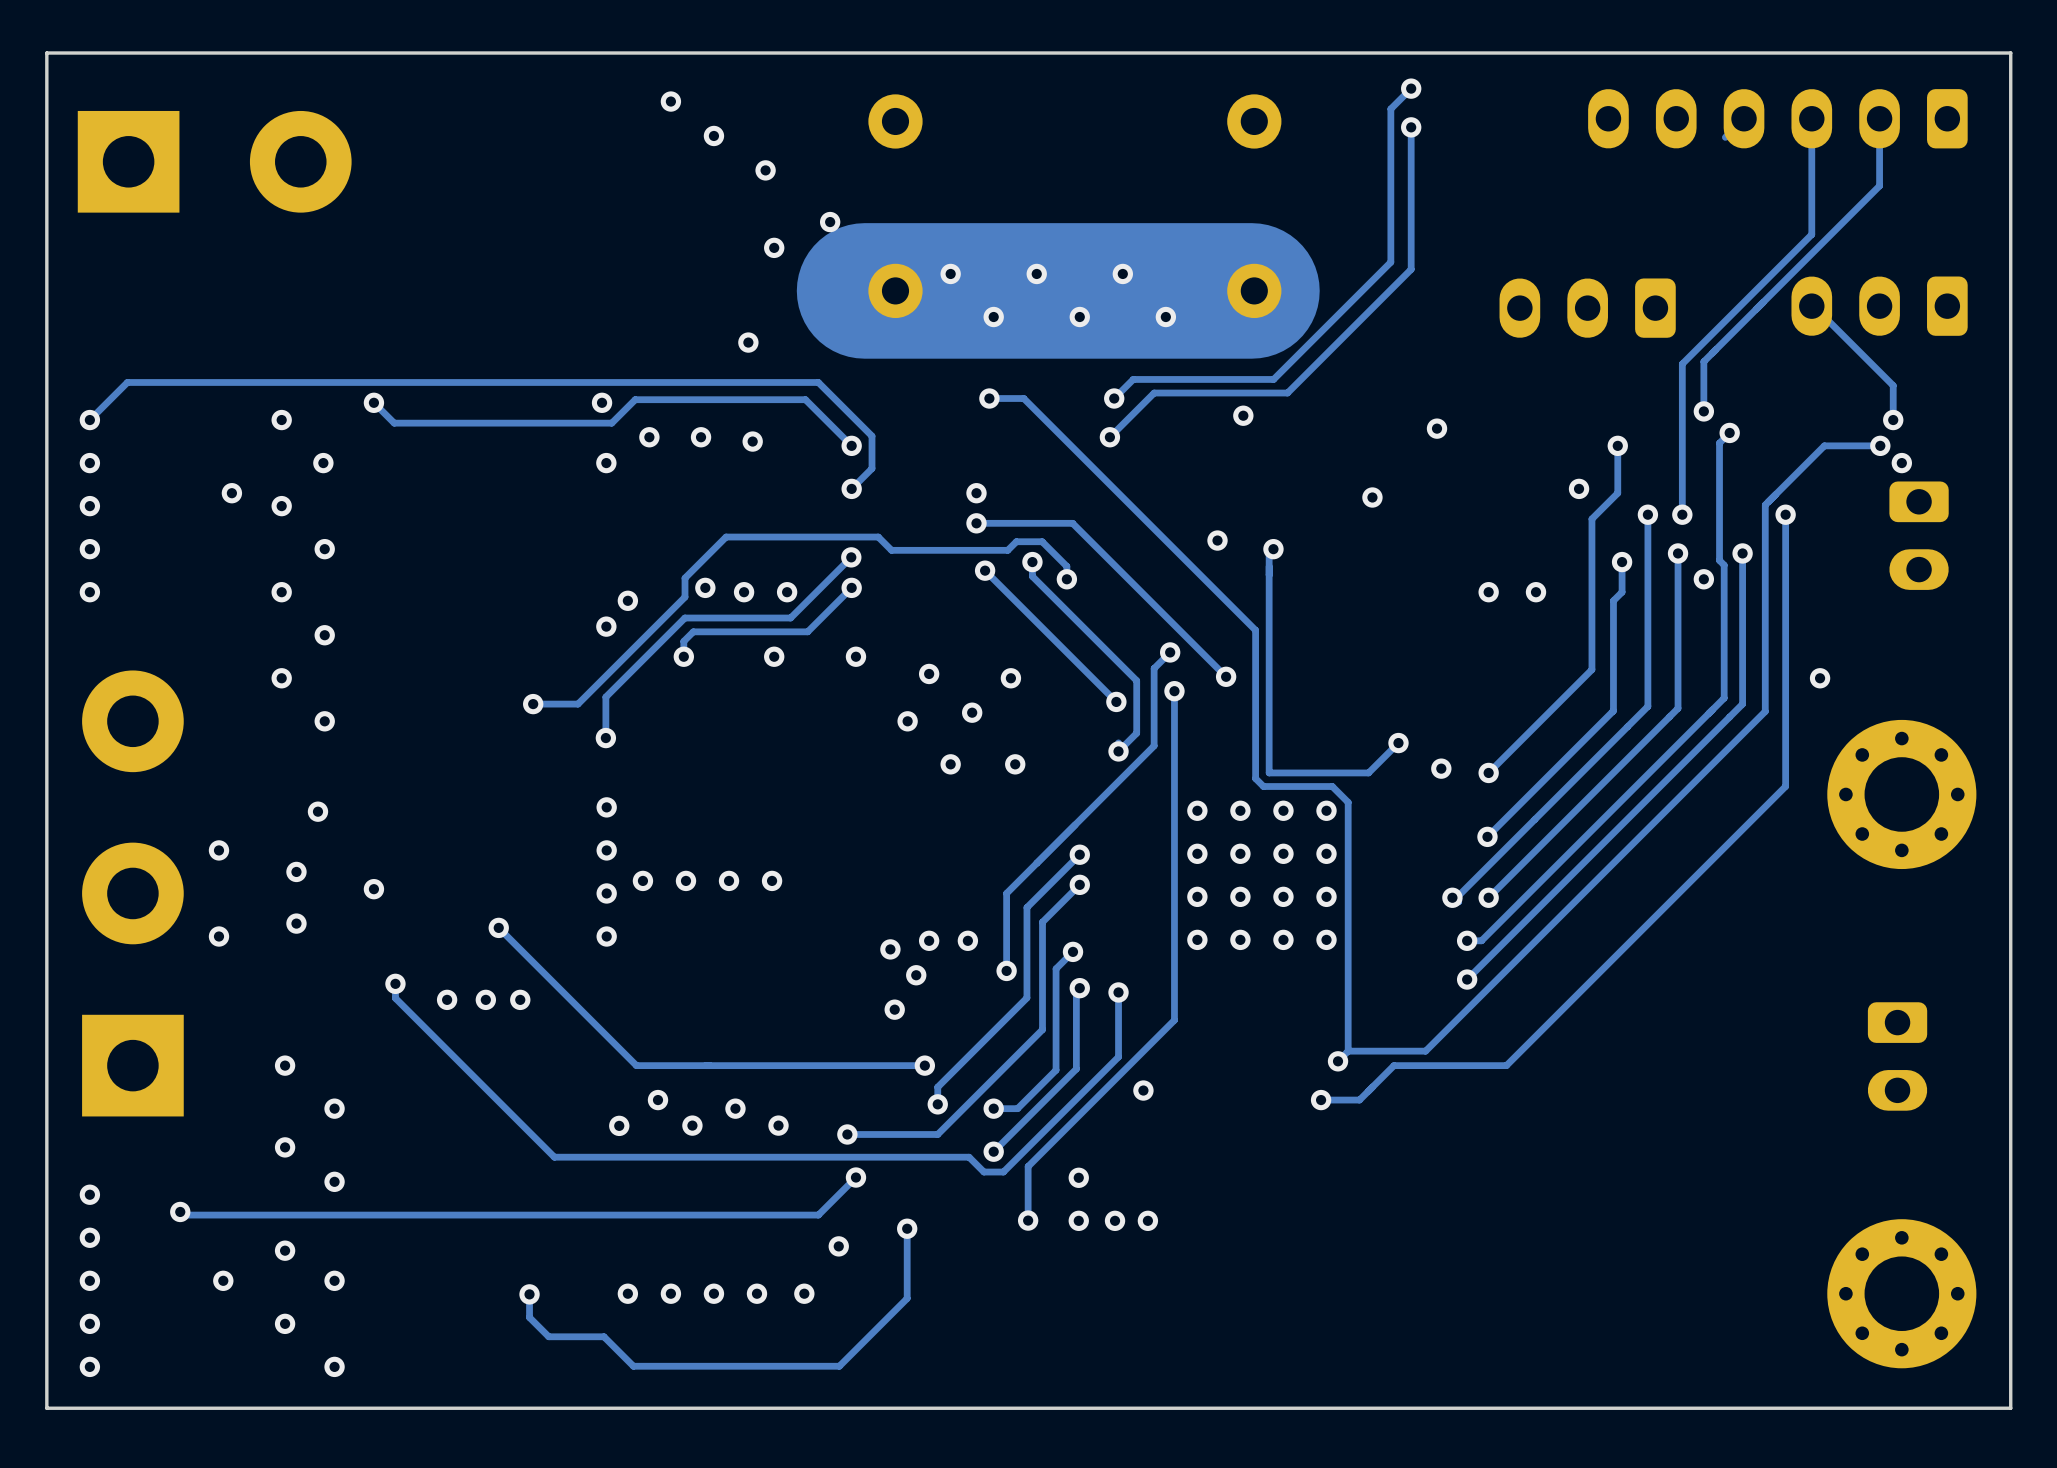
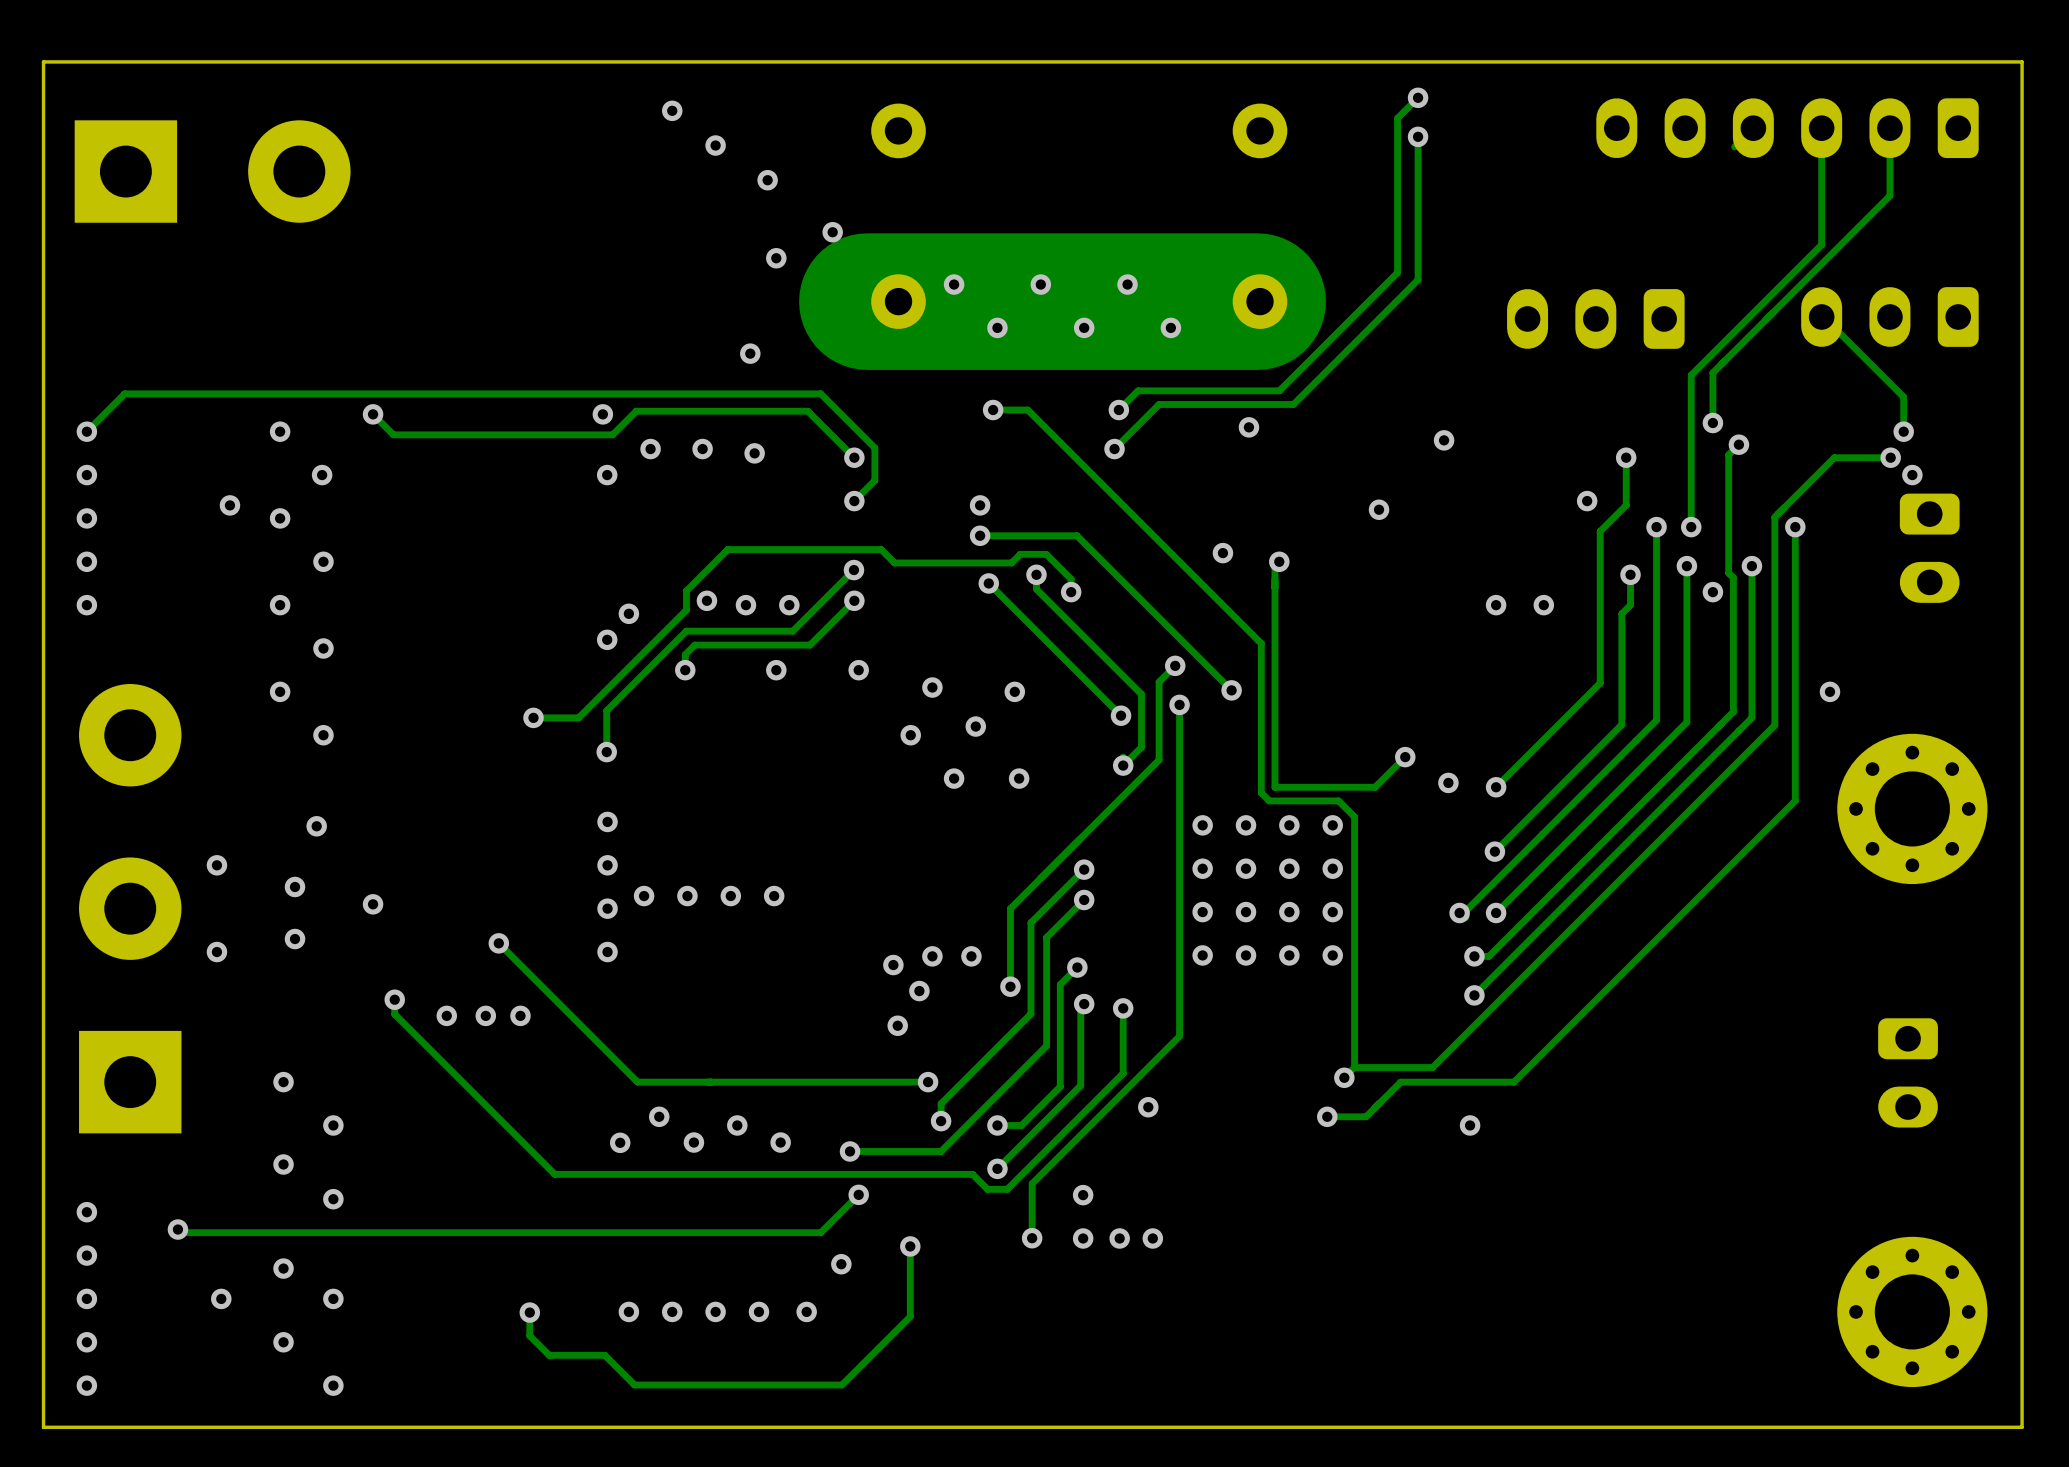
via: none -> (1470, 1125)

